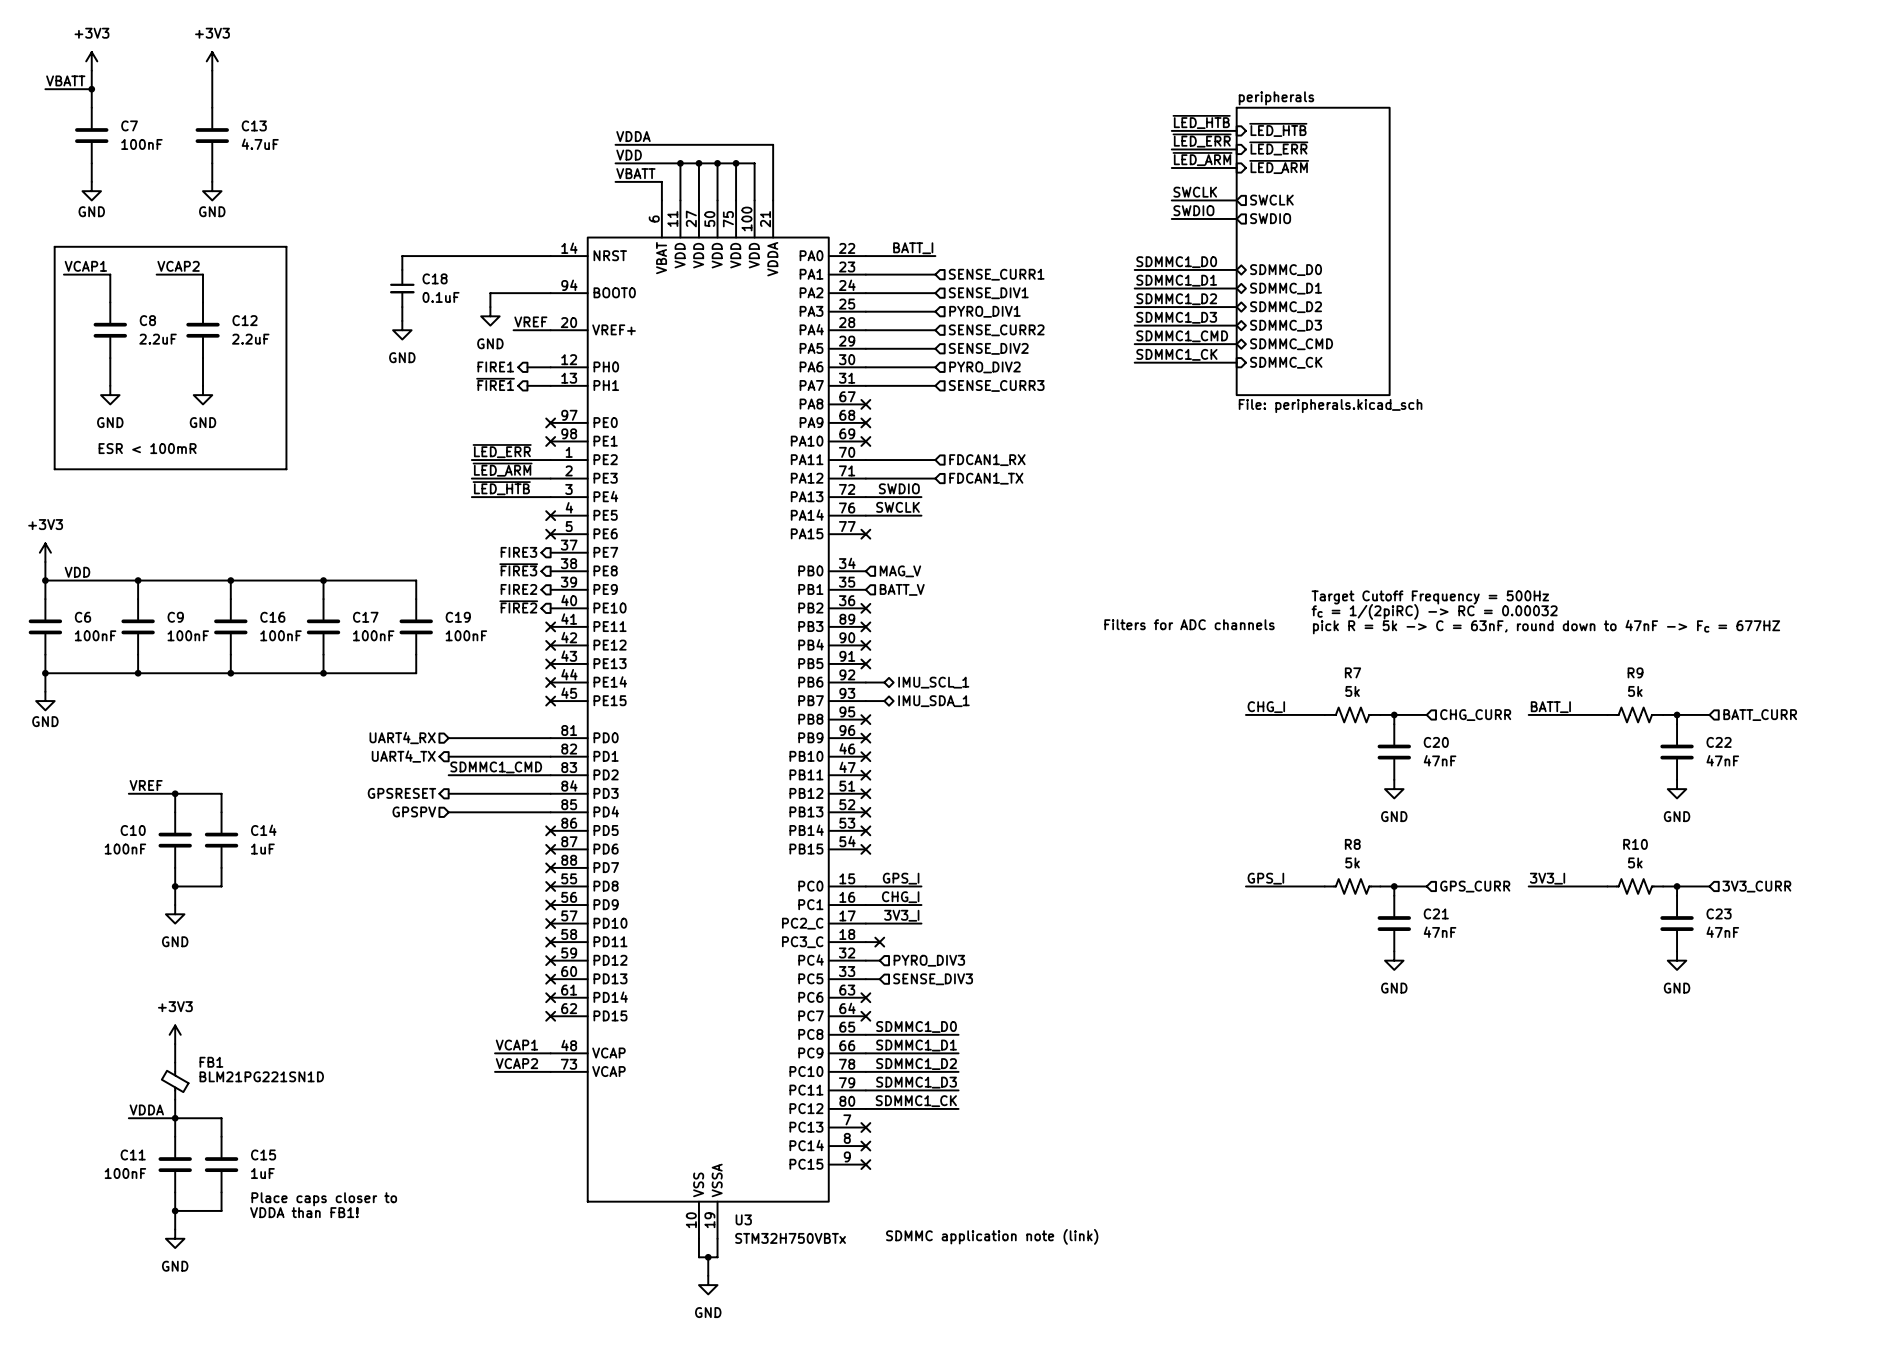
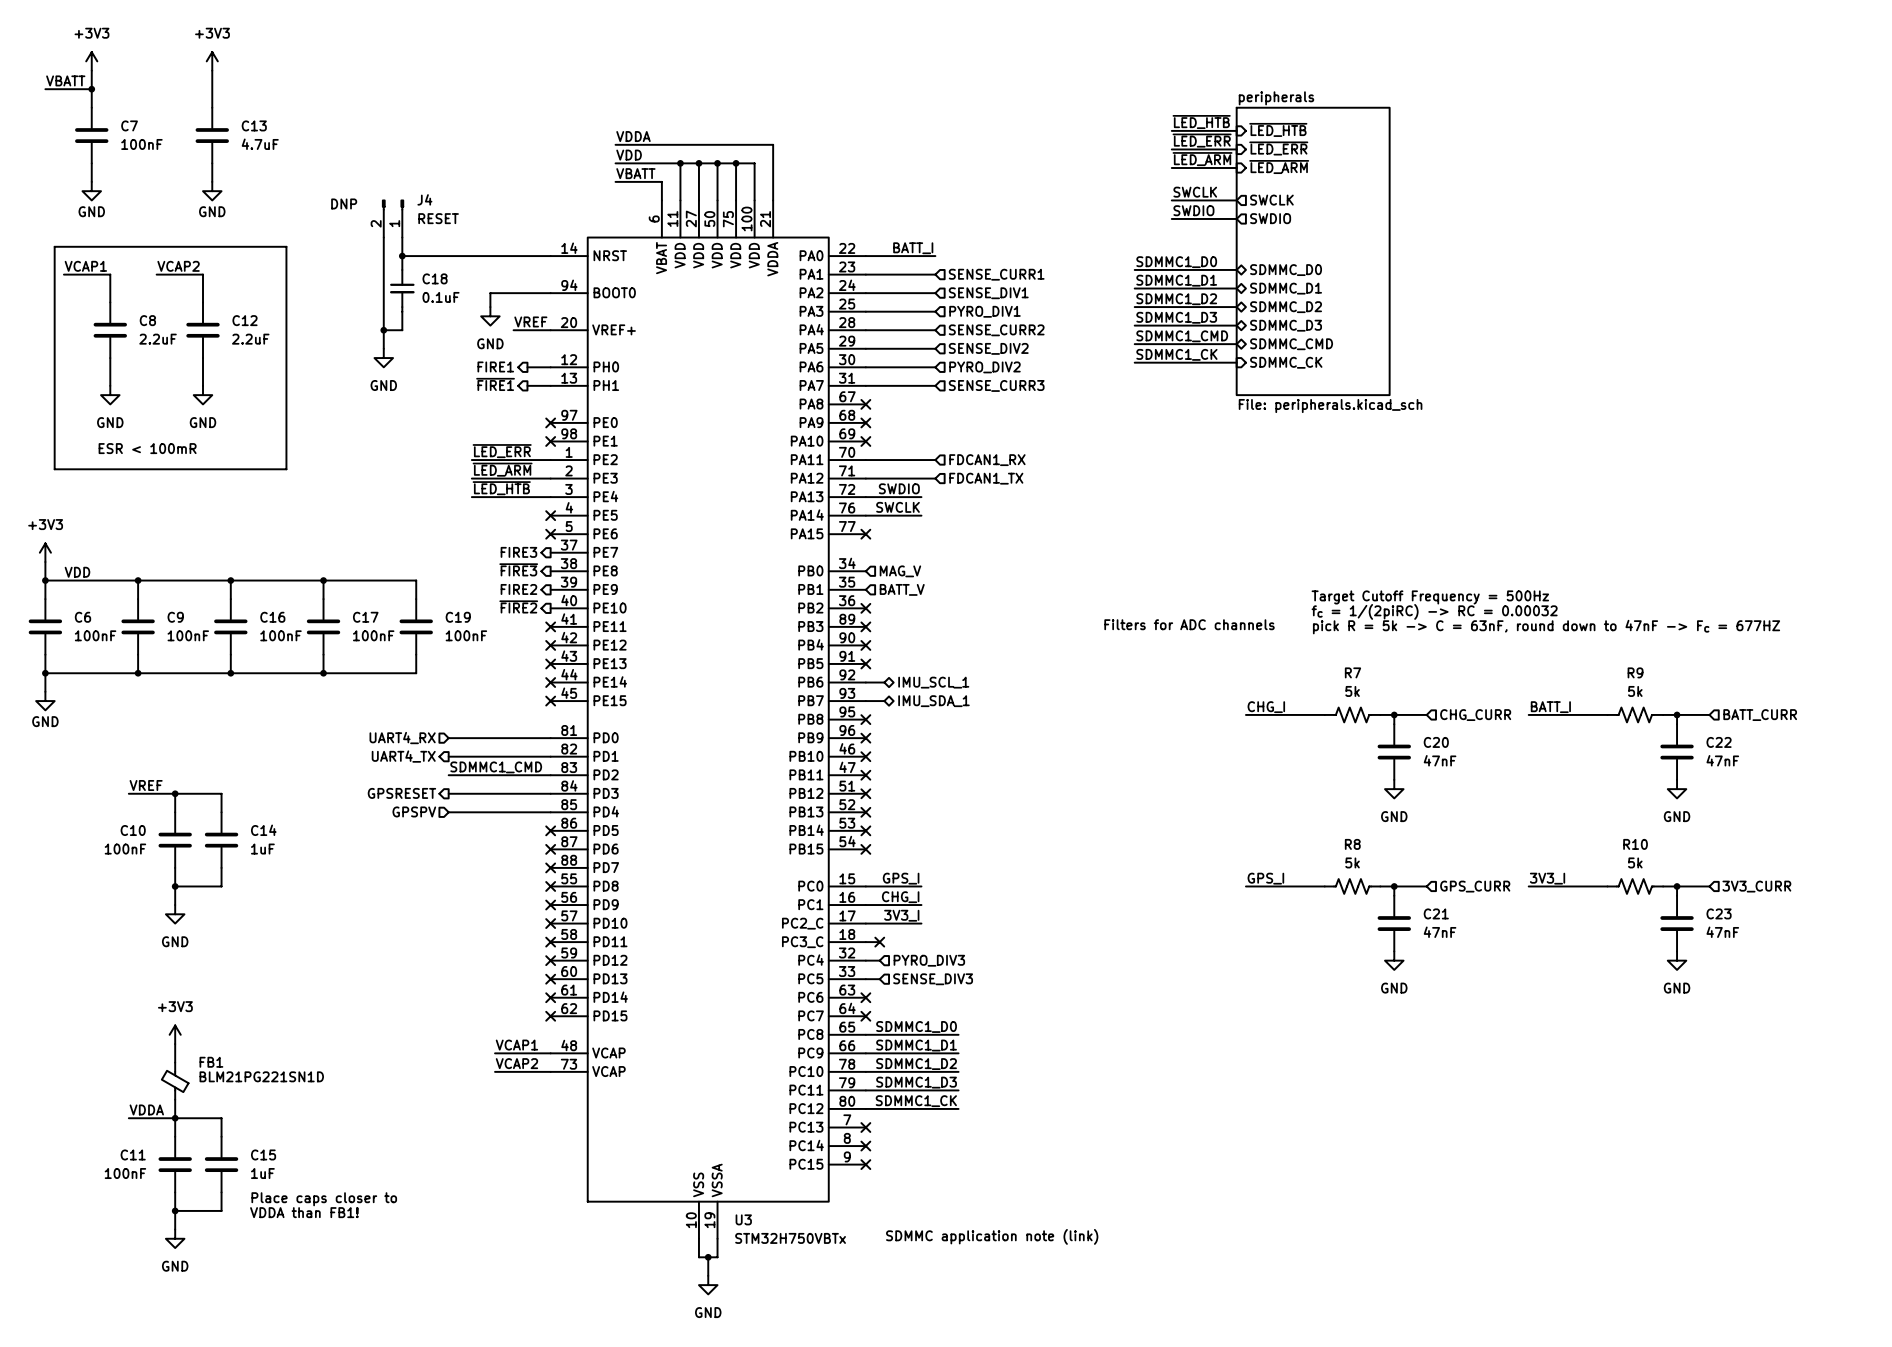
text: none -> DNP (344, 203)
J4: none -> RESET (393, 218)
wire: none -> (383, 237) (383, 348)
wire: none -> (402, 237) (402, 256)
junction: none -> (402, 256)
junction: none -> (383, 330)
power symbol position: GND (402, 330) -> GND (383, 358)

